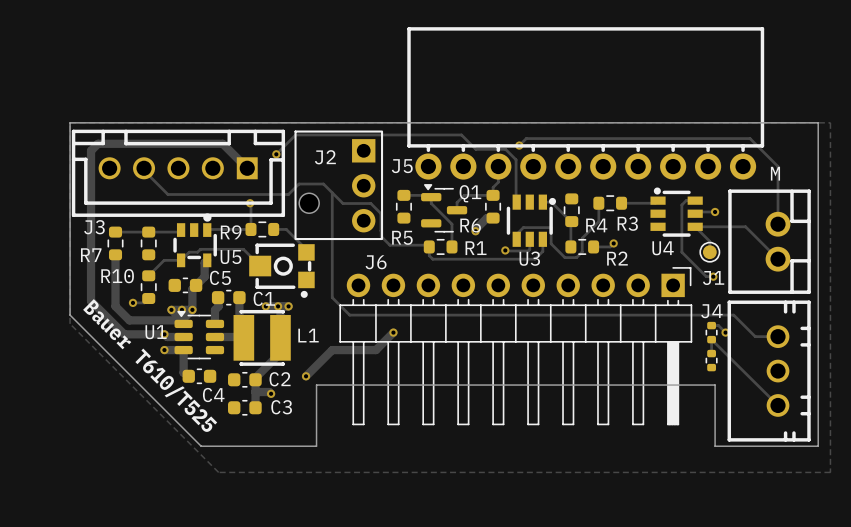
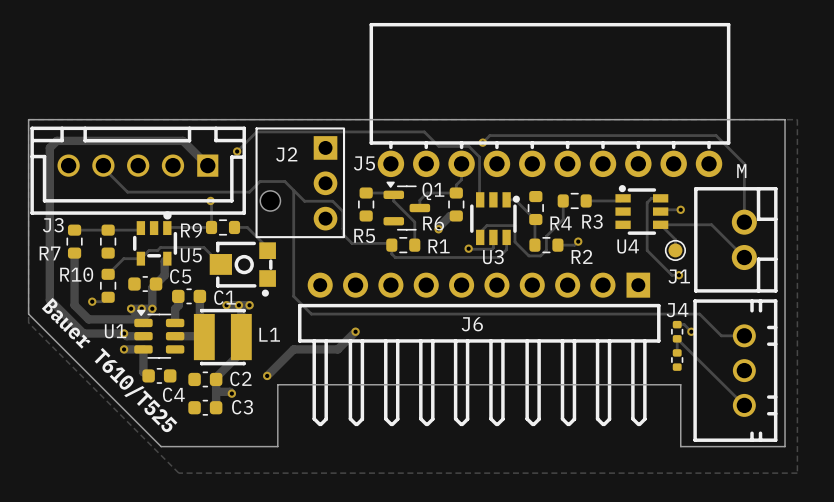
J6 name position: J6 (376, 262) -> J6 (472, 324)
J6 footprint: [339, 267, 693, 426] -> [298, 272, 661, 427]

